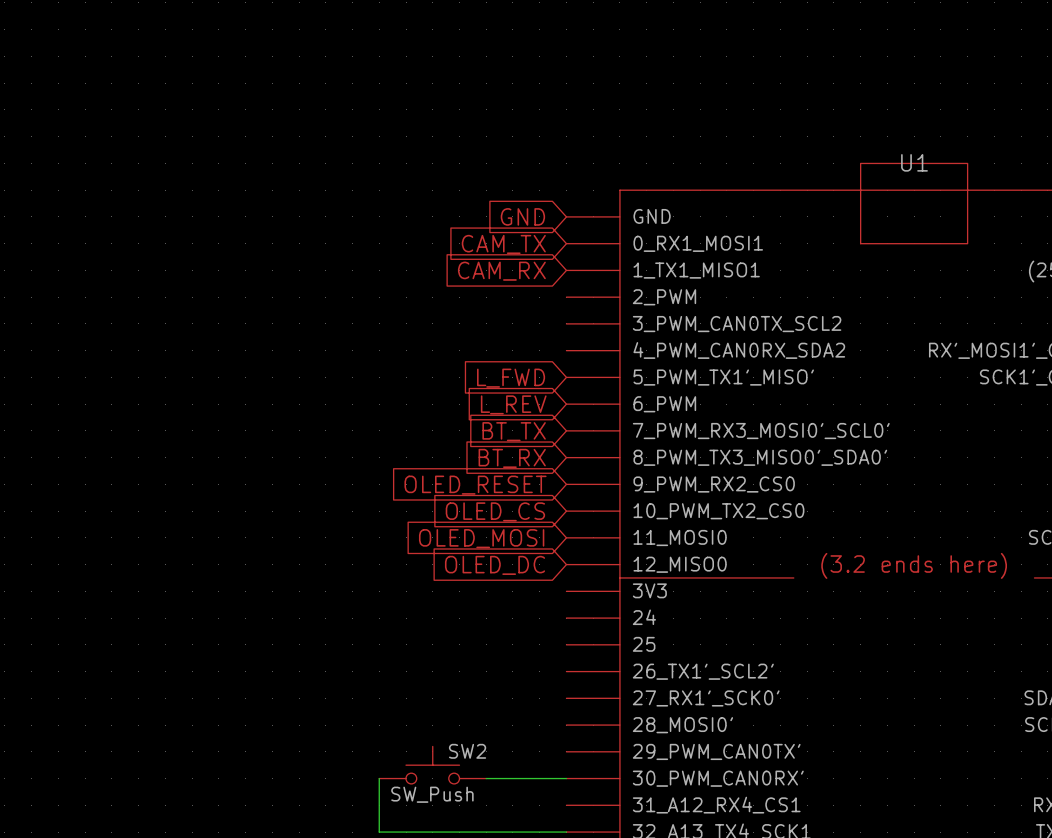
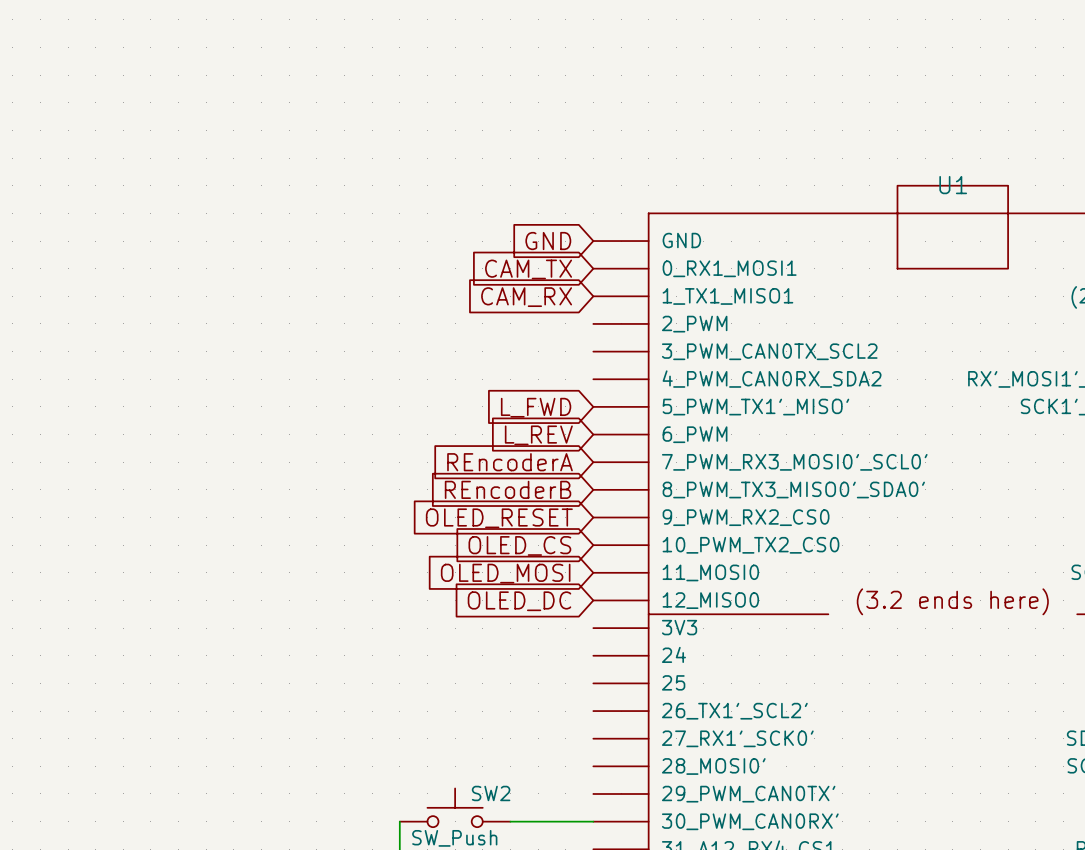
global label: BT_TX (514, 431) -> REncoderA (510, 462)
global label: BT_RX (512, 458) -> REncoderB (508, 489)

